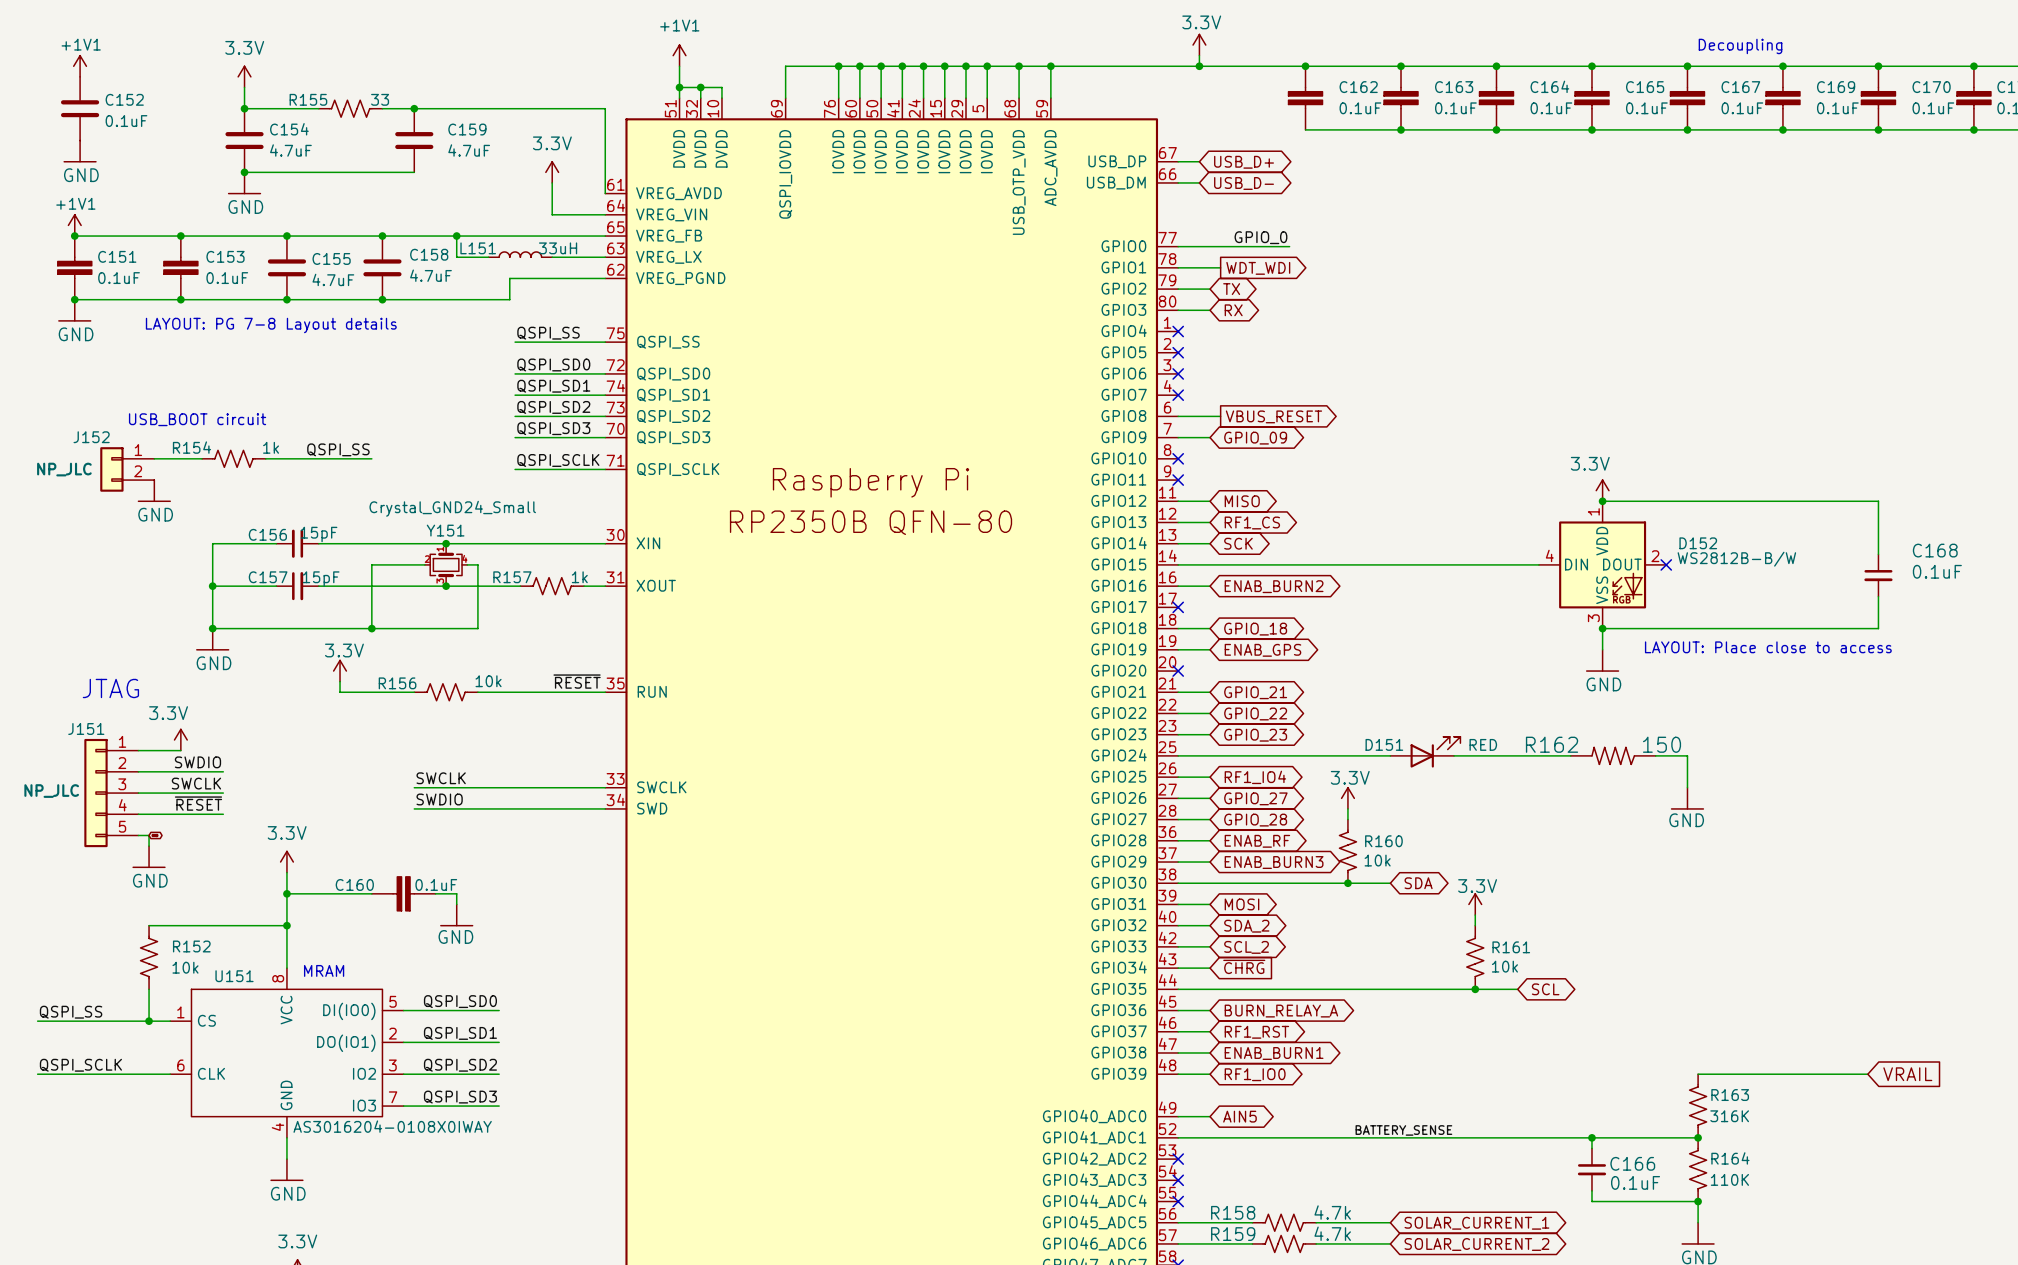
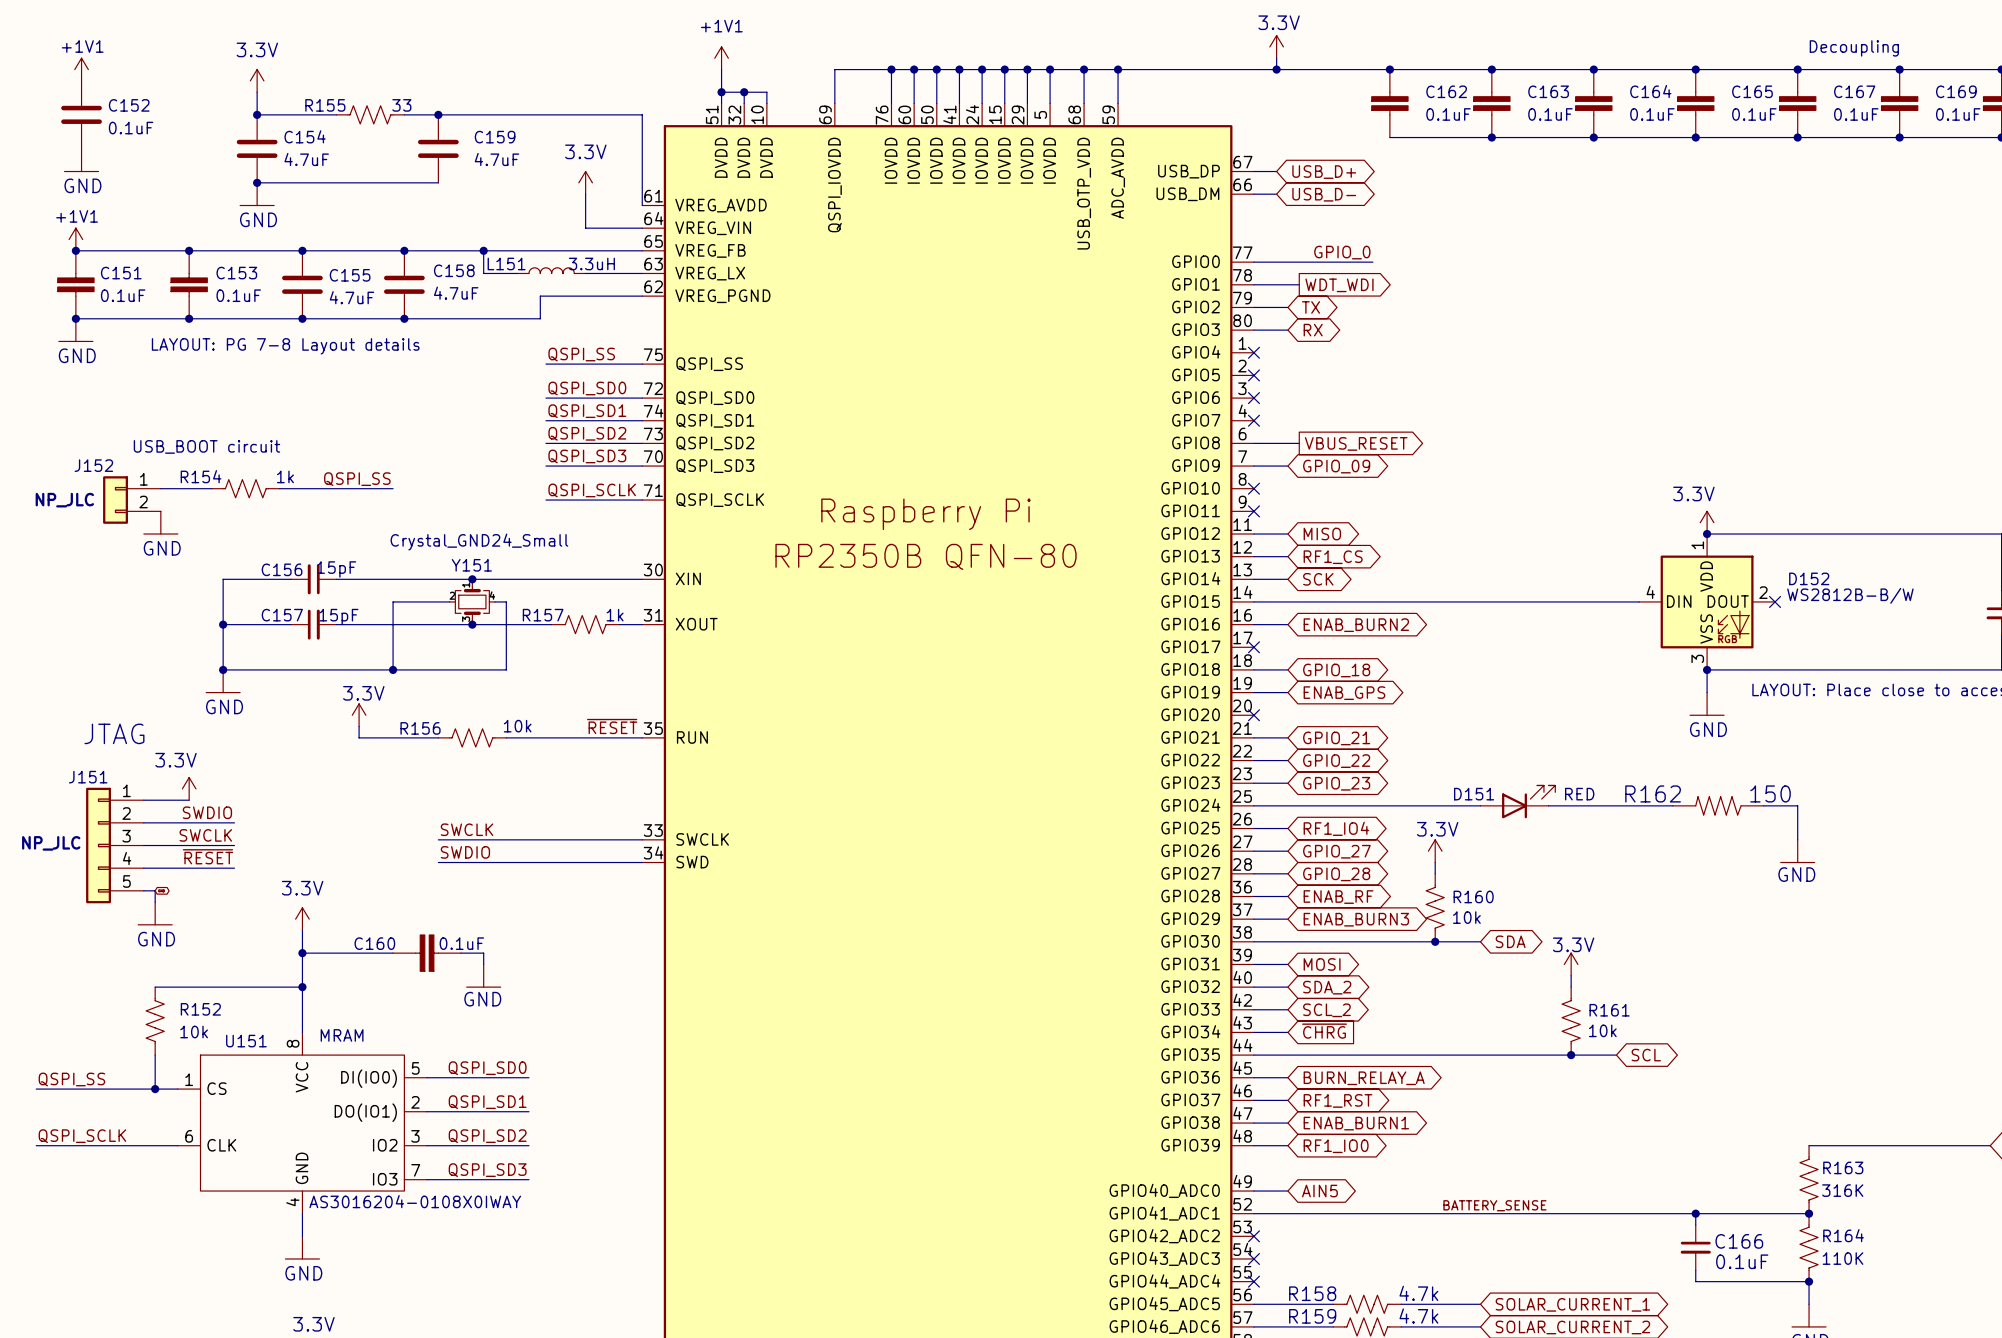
L151 value: 33uH (558, 248) -> 3.3uH (591, 263)

